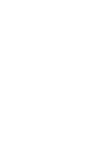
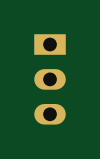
part: none -> (50, 79)

